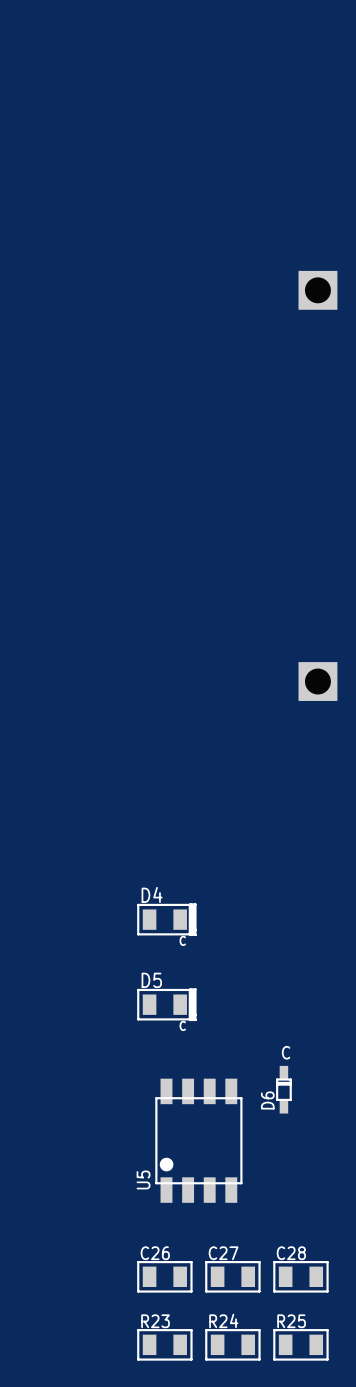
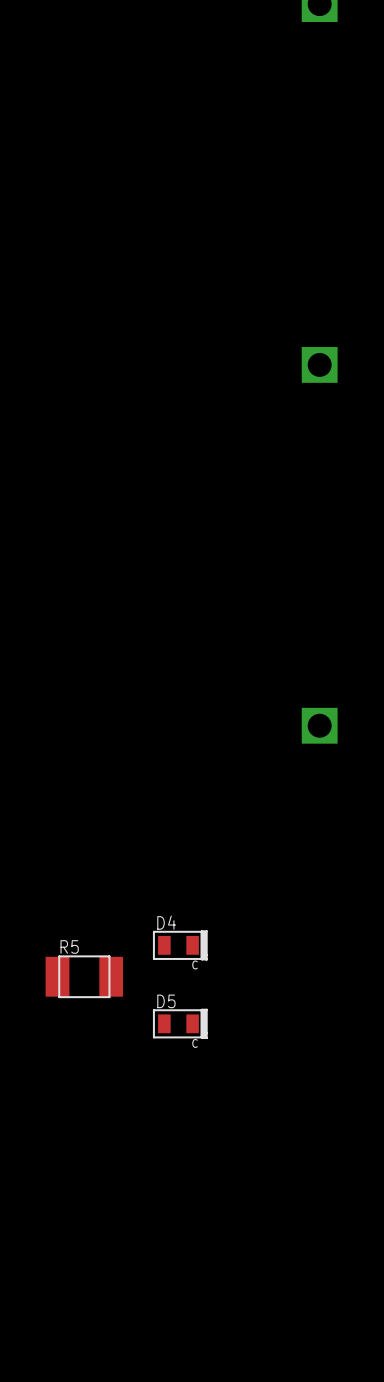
R5: none -> (84, 976)
D6: (283, 1089) -> none
U5: (198, 1140) -> none
C26: (164, 1276) -> none
C27: (232, 1276) -> none
C28: (300, 1276) -> none
R23: (164, 1344) -> none
R24: (232, 1344) -> none
R25: (300, 1344) -> none

